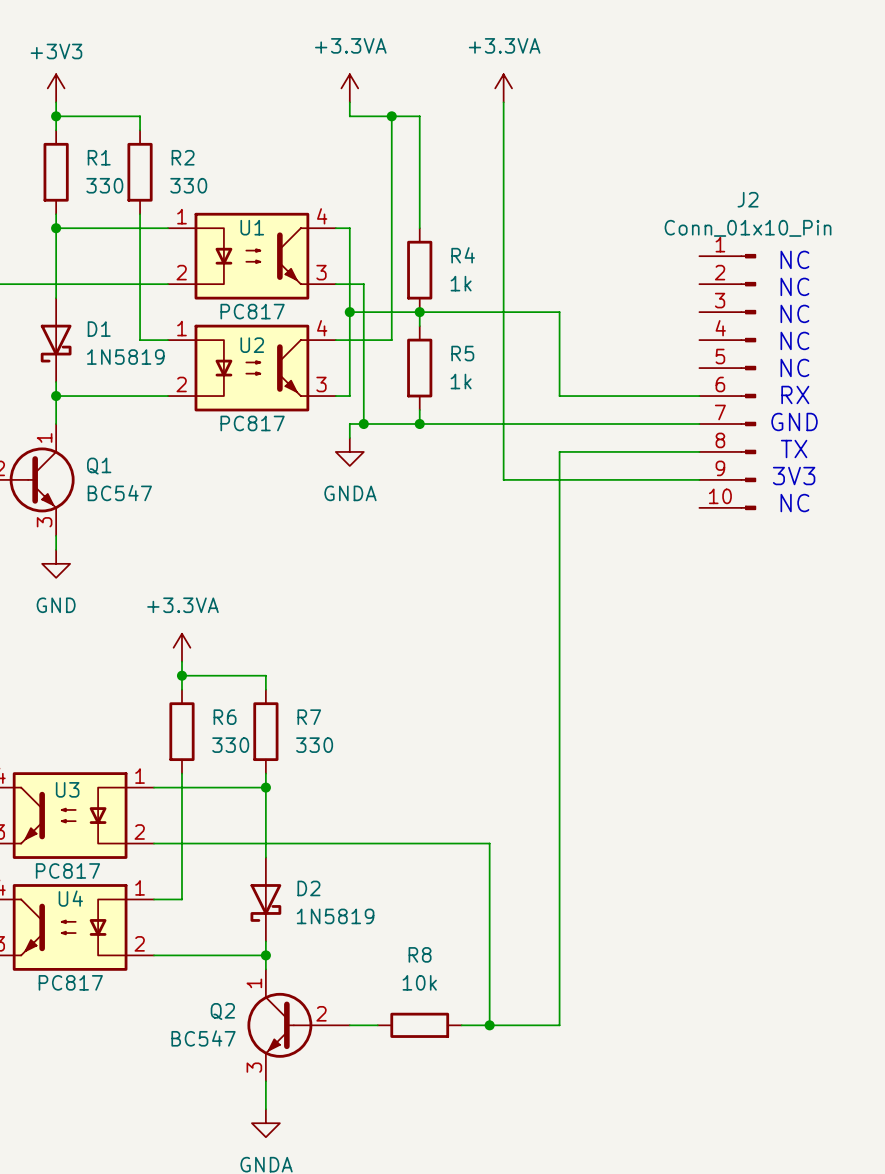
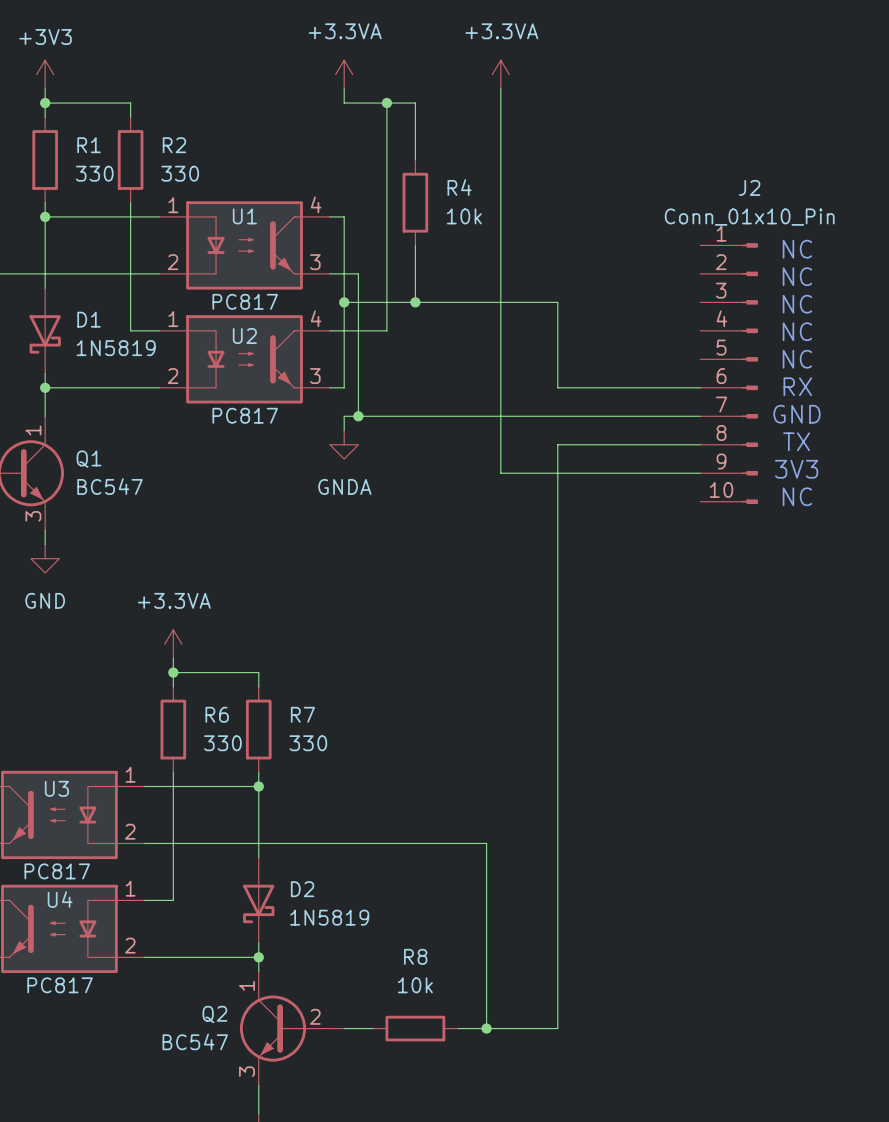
wire: (419, 172) (419, 228) -> none
R4 position: (419, 270) -> (415, 202)
R4 value: 1k (461, 283) -> 10k (464, 216)
wire: (419, 312) (419, 326) -> (415, 302) (415, 245)
R5: 1k (419, 368) -> none
wire: (419, 410) (419, 423) -> none
junction: (419, 423) -> none

